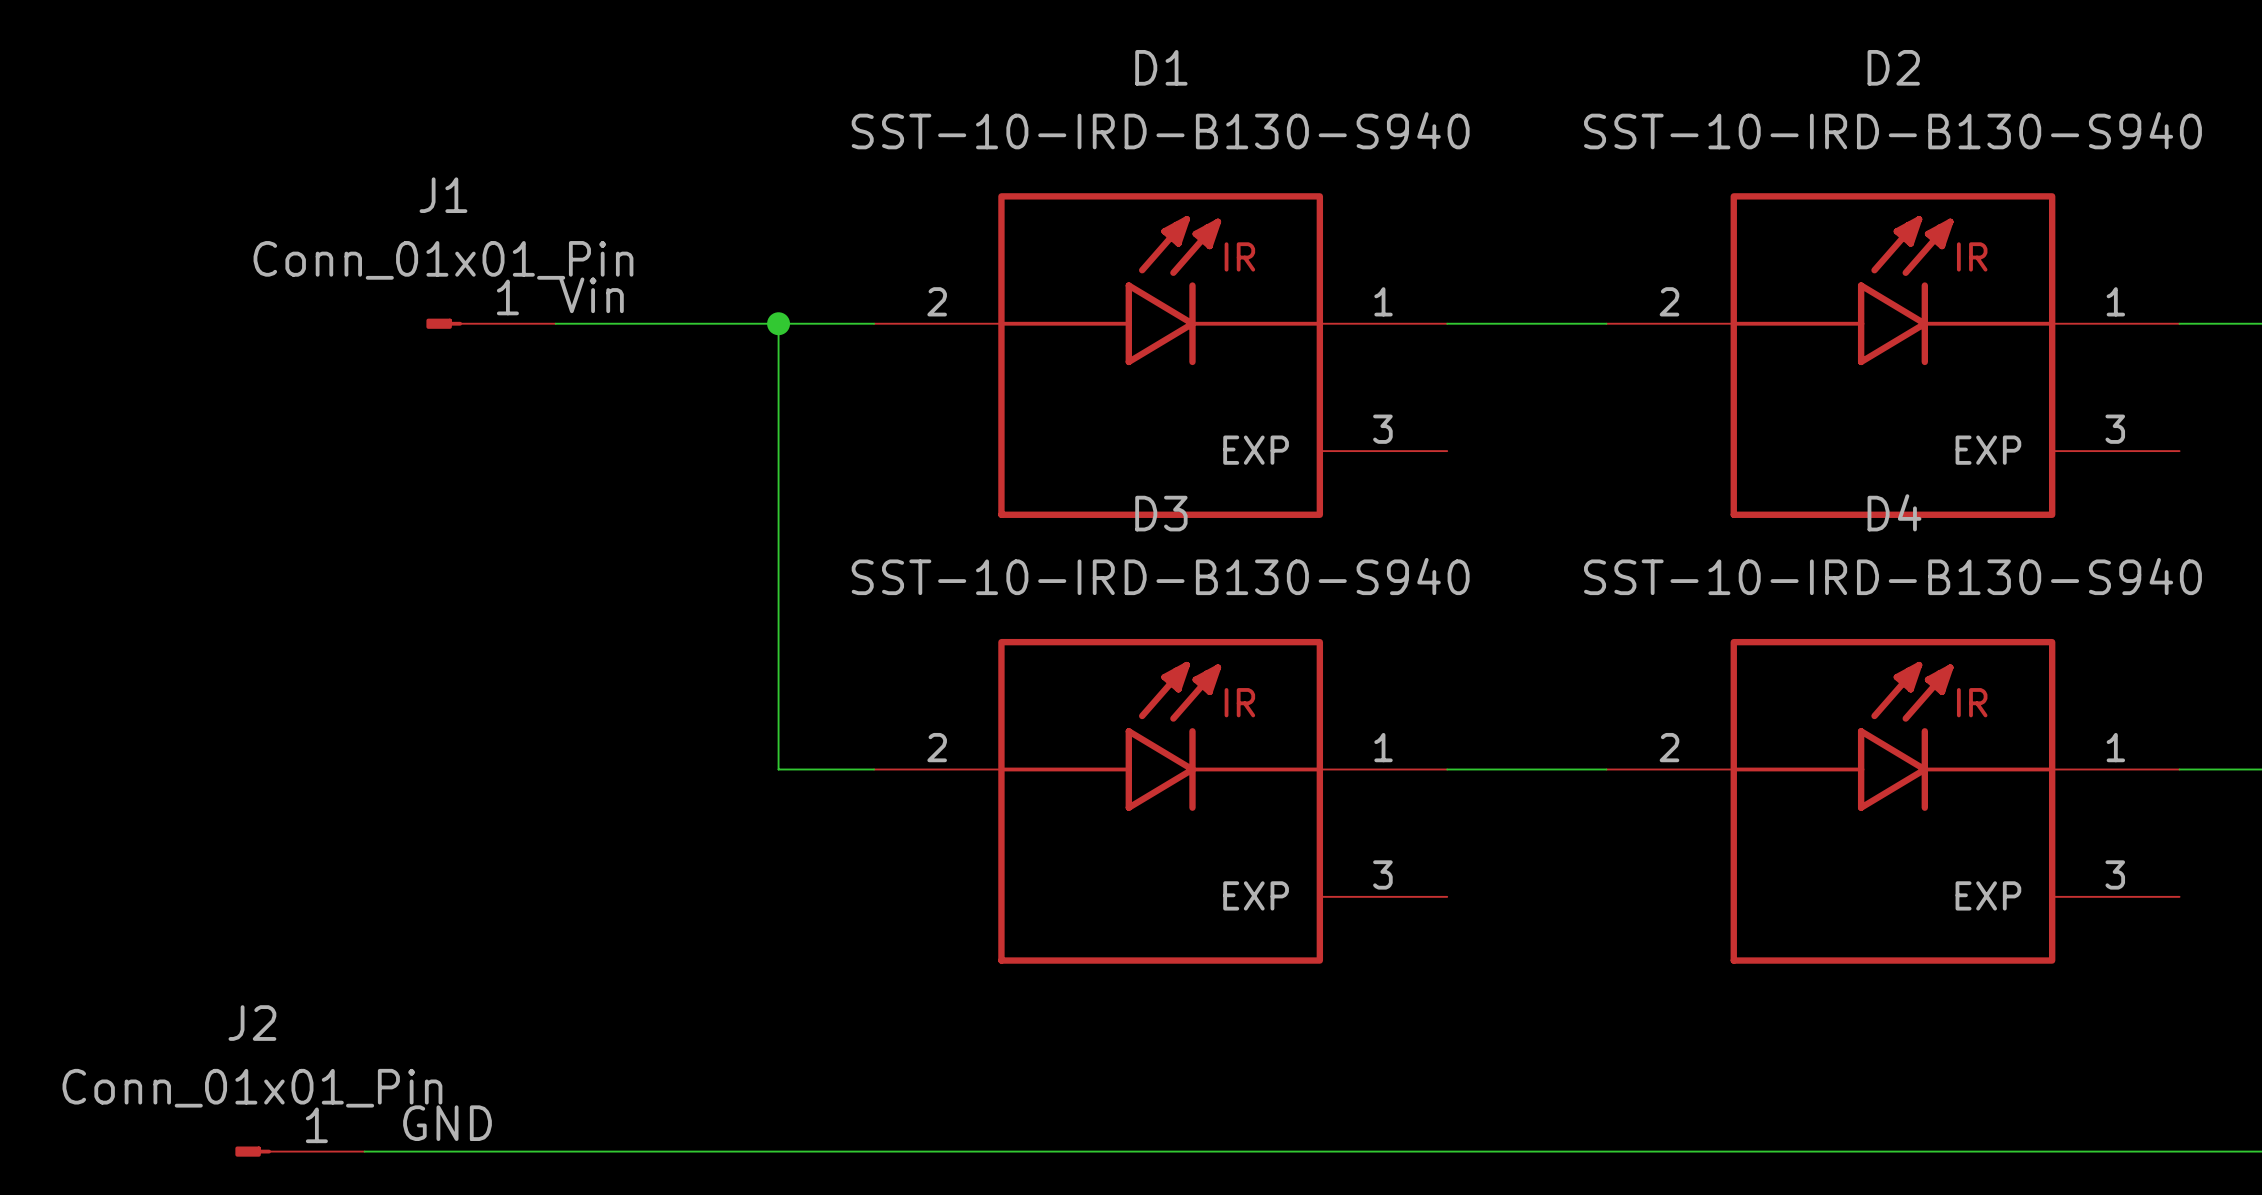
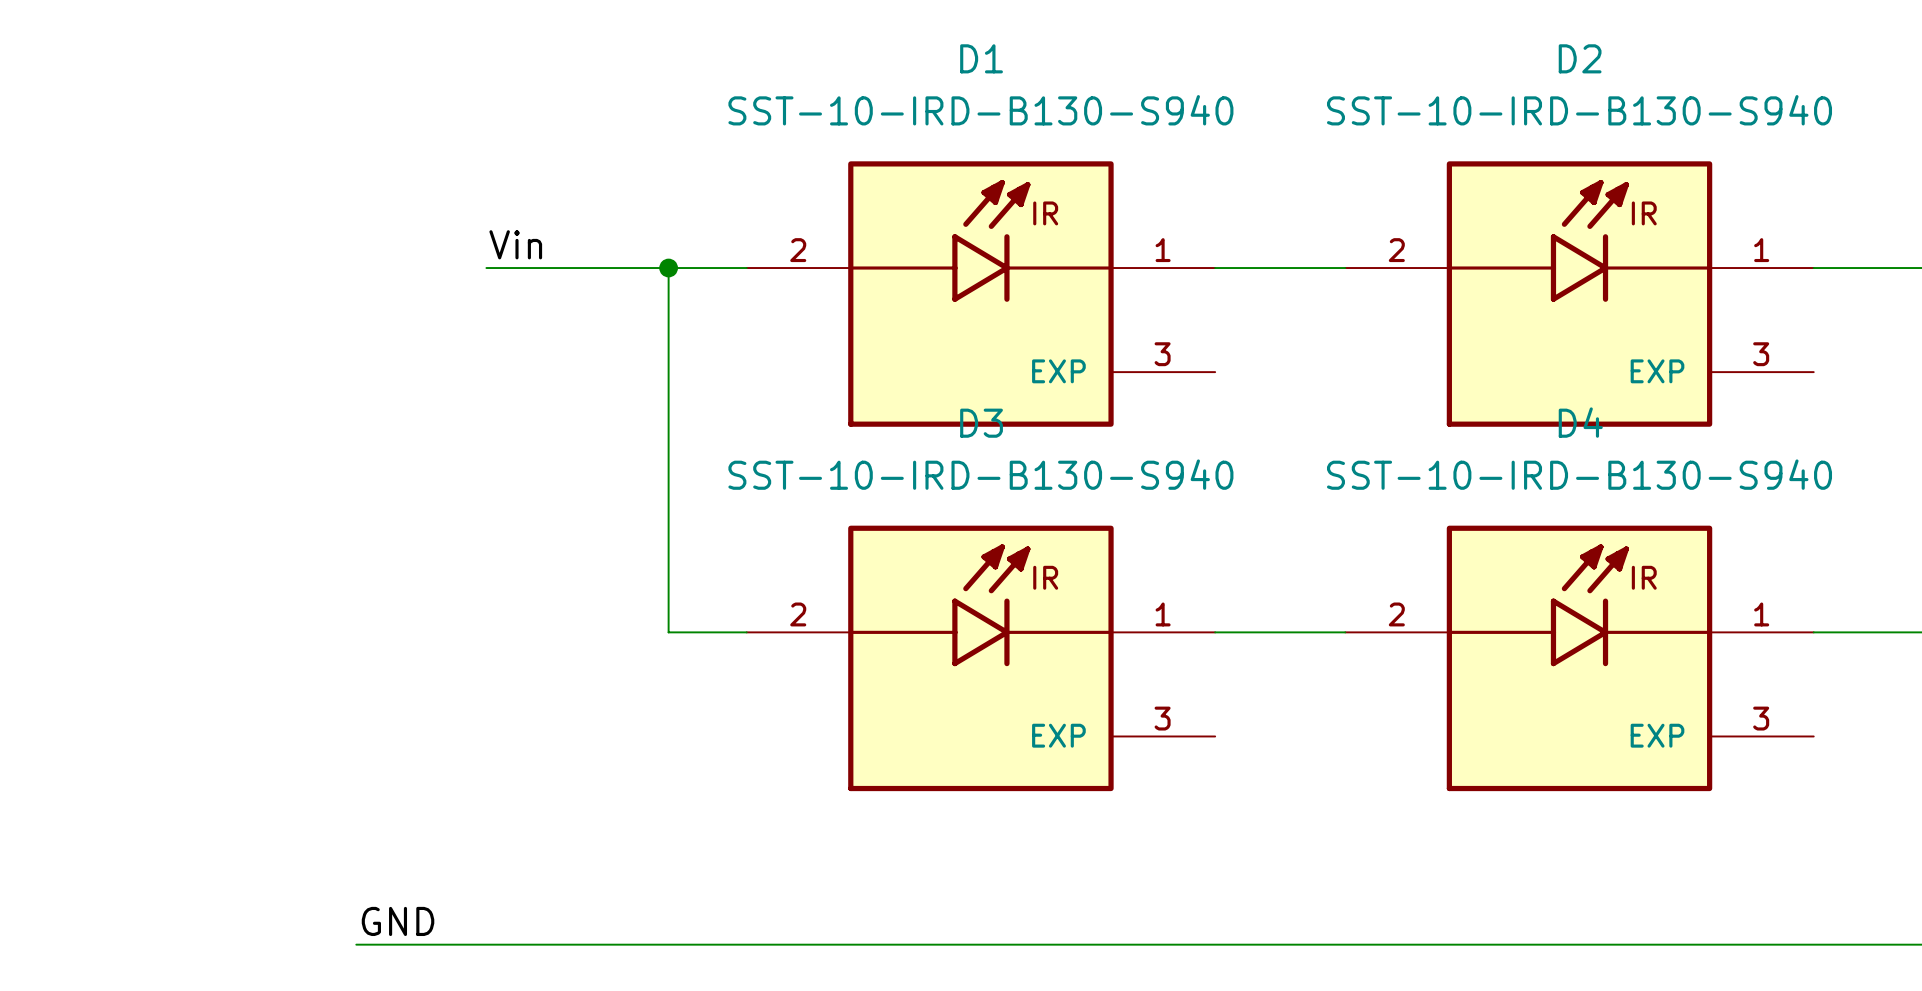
J1: Conn_01x01_Pin (491, 323) -> none
J2: Conn_01x01_Pin (300, 1151) -> none
wire: (364, 1151) (396, 1151) -> none

